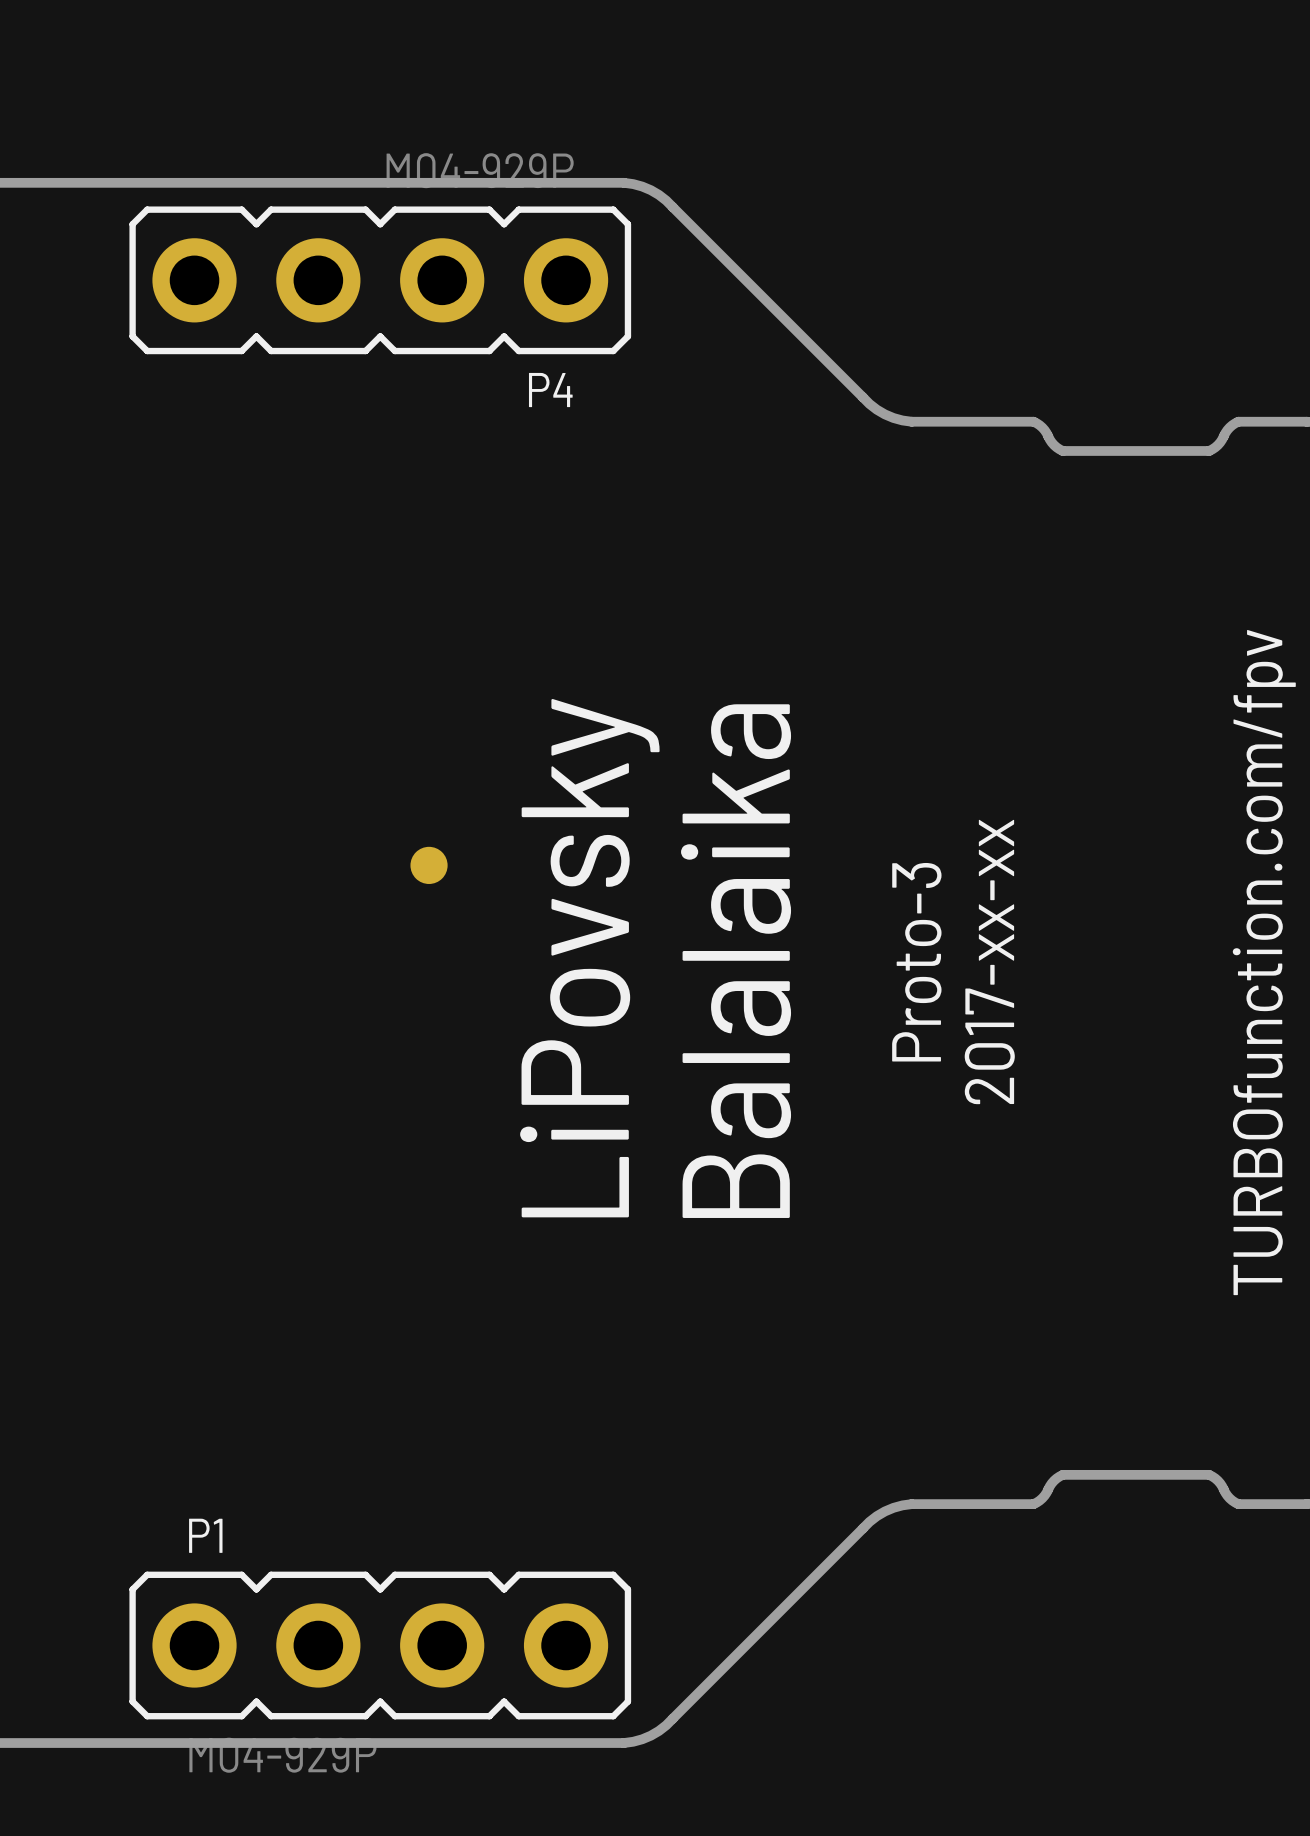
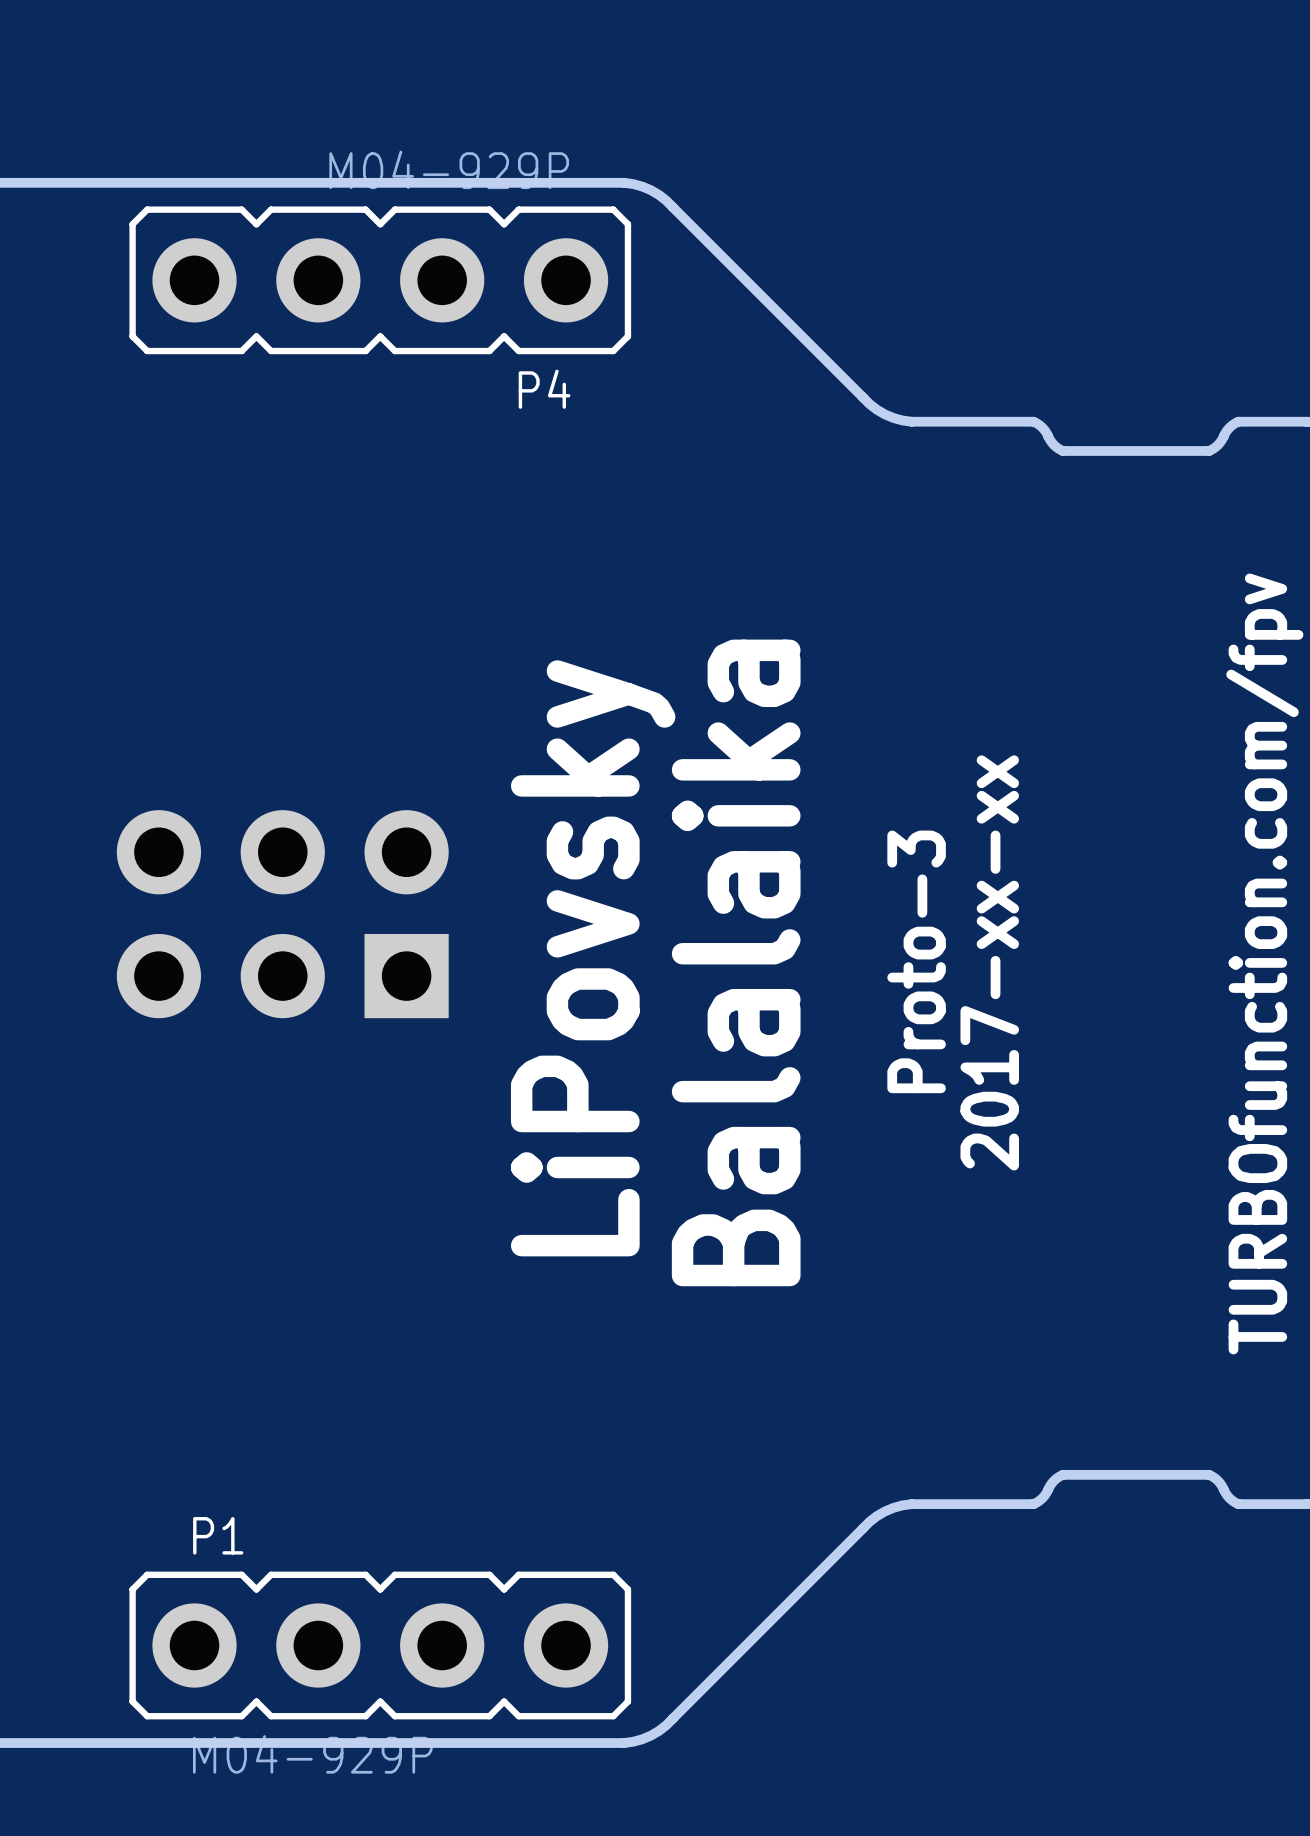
part: (429, 865) -> none
part: none -> (282, 914)

